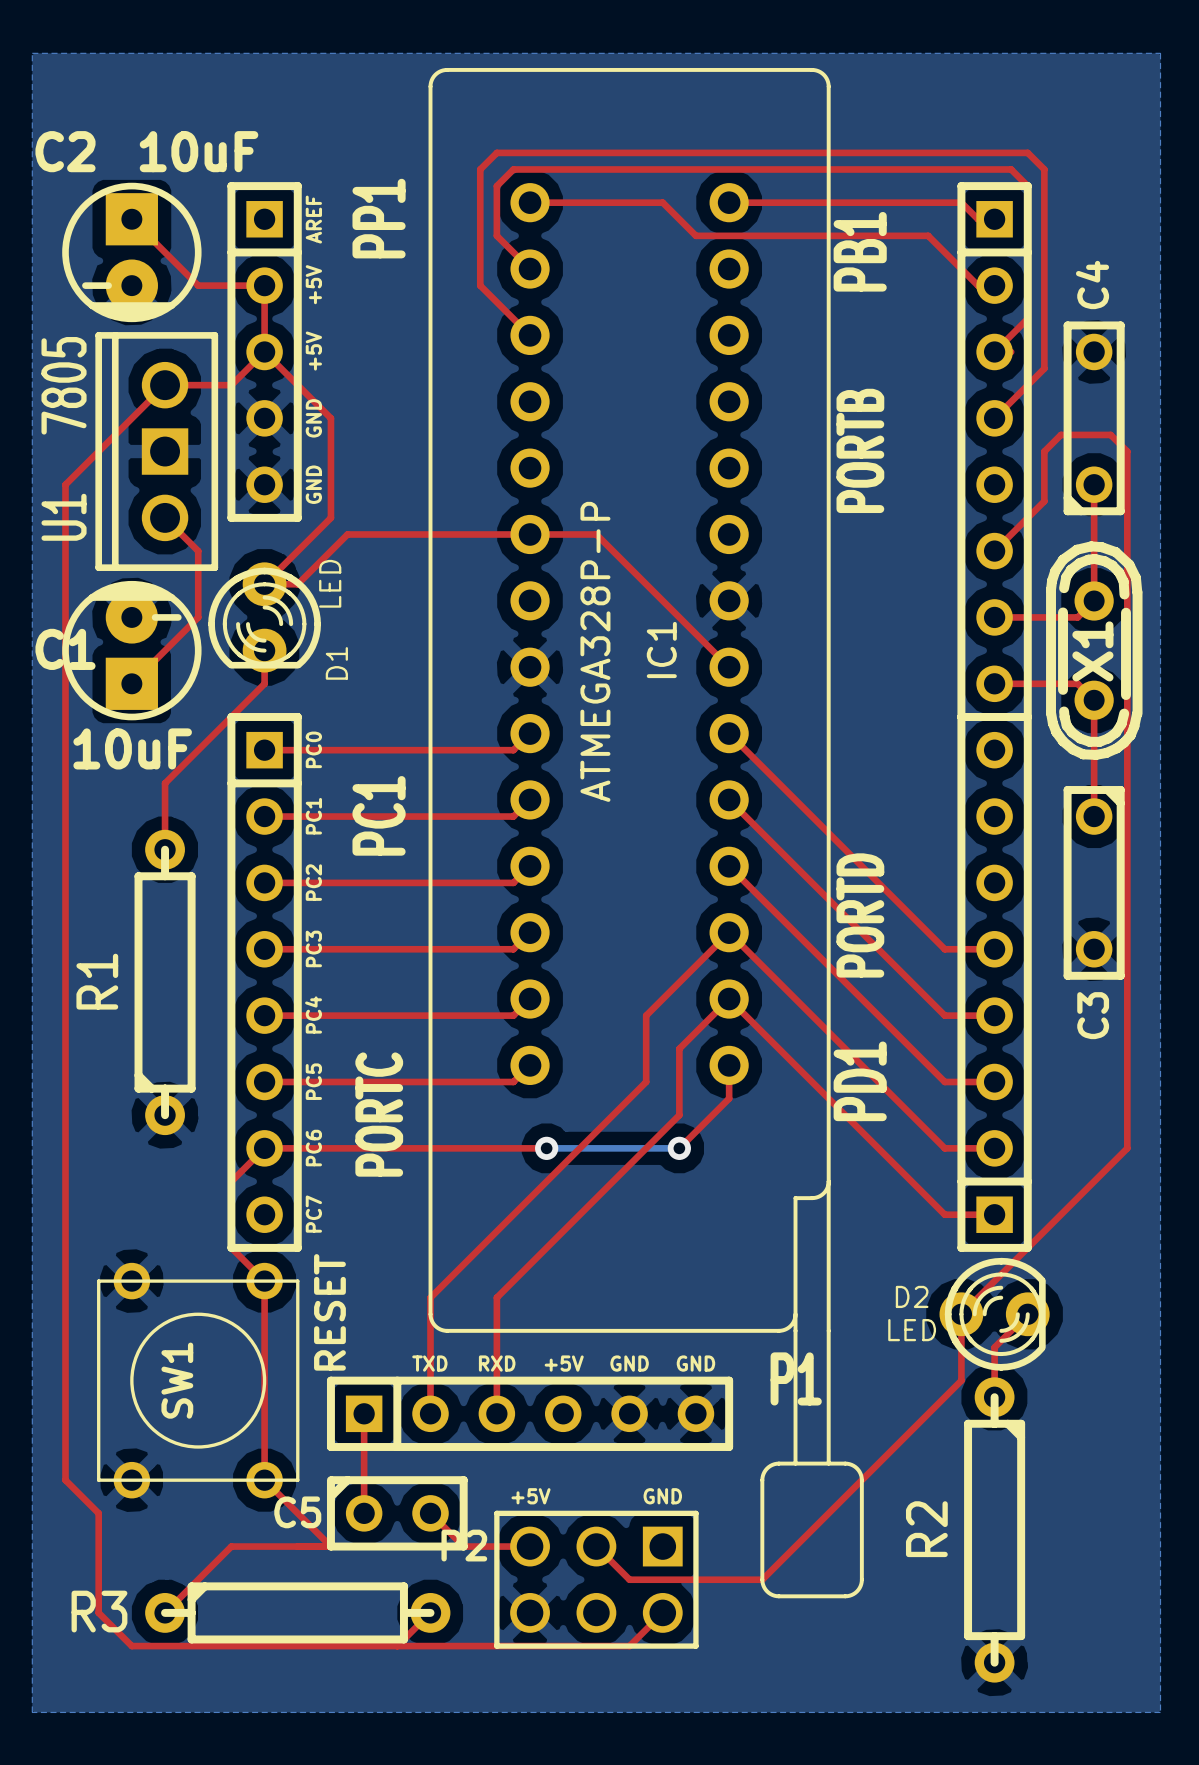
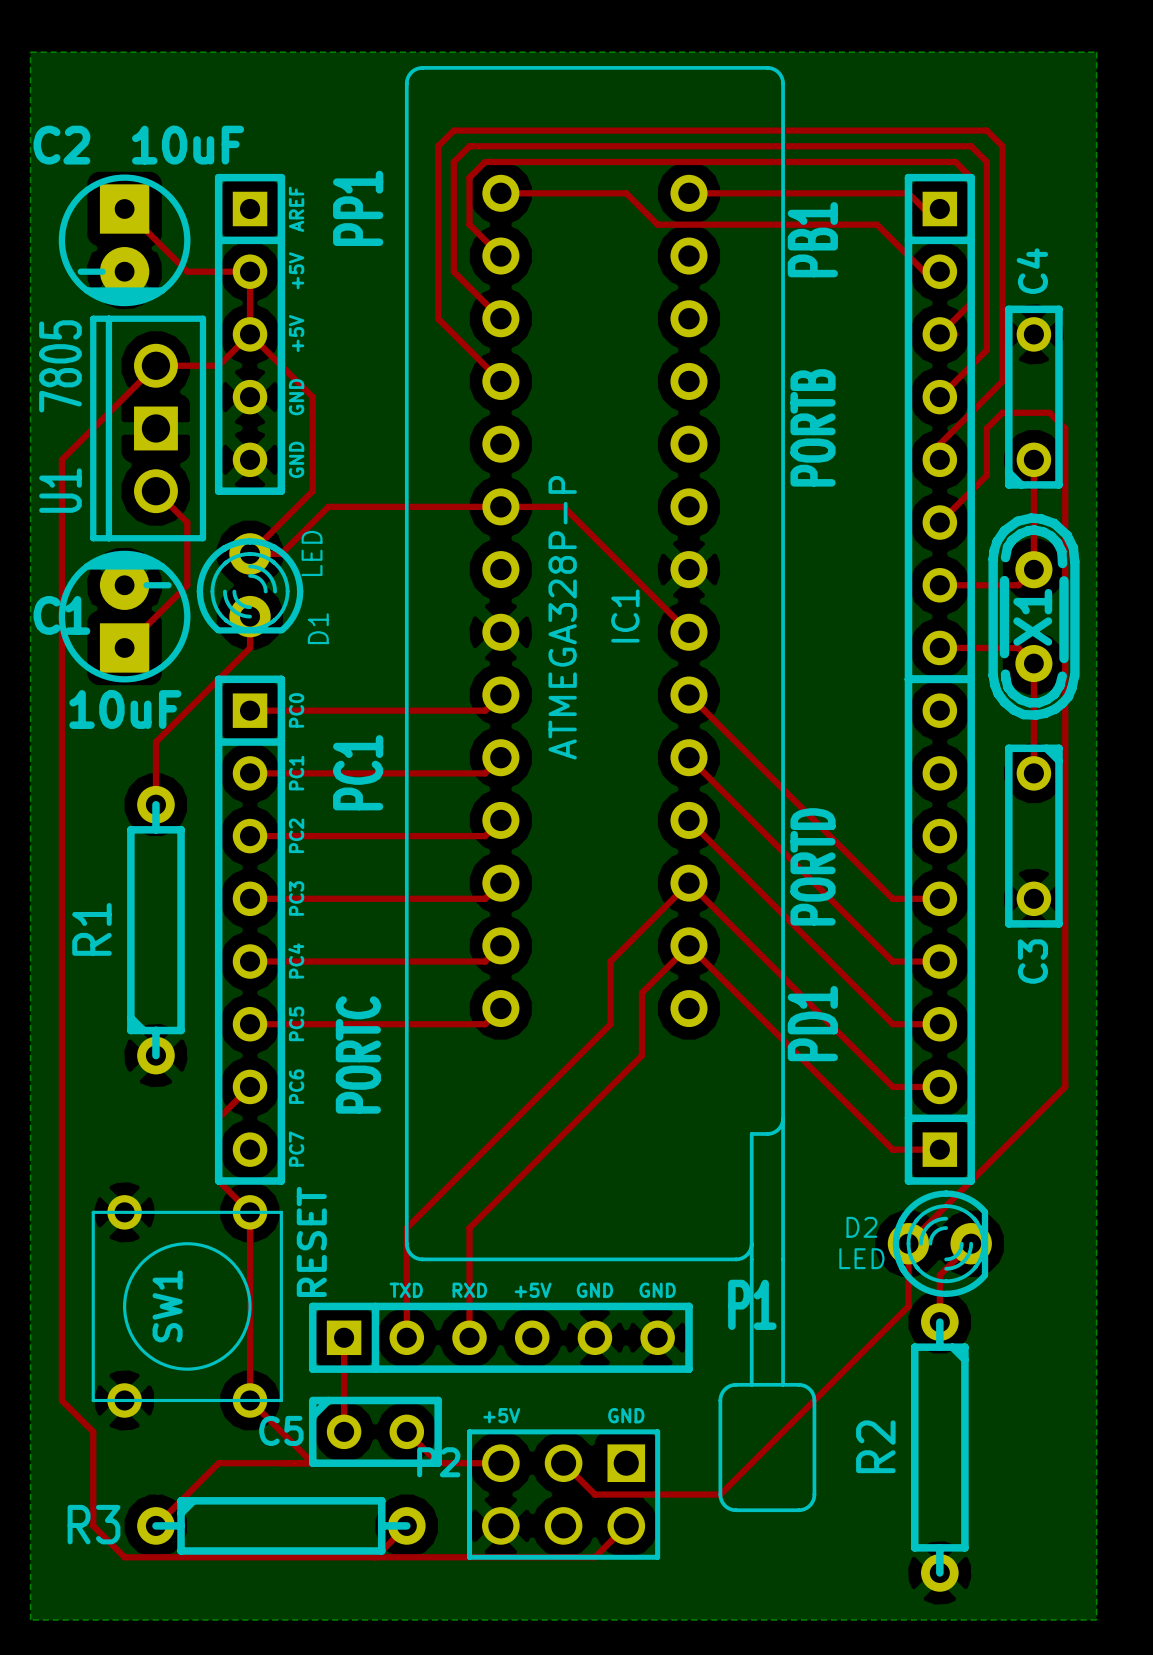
top track: none -> (500, 381) (438, 318) (438, 146) (453, 130) (986, 130) (1002, 146) (1002, 381) (939, 444) (939, 459)
top track: (729, 1065) (729, 1098) (679, 1148) -> none
top track: (264, 1148) (546, 1148) -> none
bottom track: (546, 1148) (679, 1148) -> none
via: (546, 1148) -> none
via: (679, 1148) -> none

